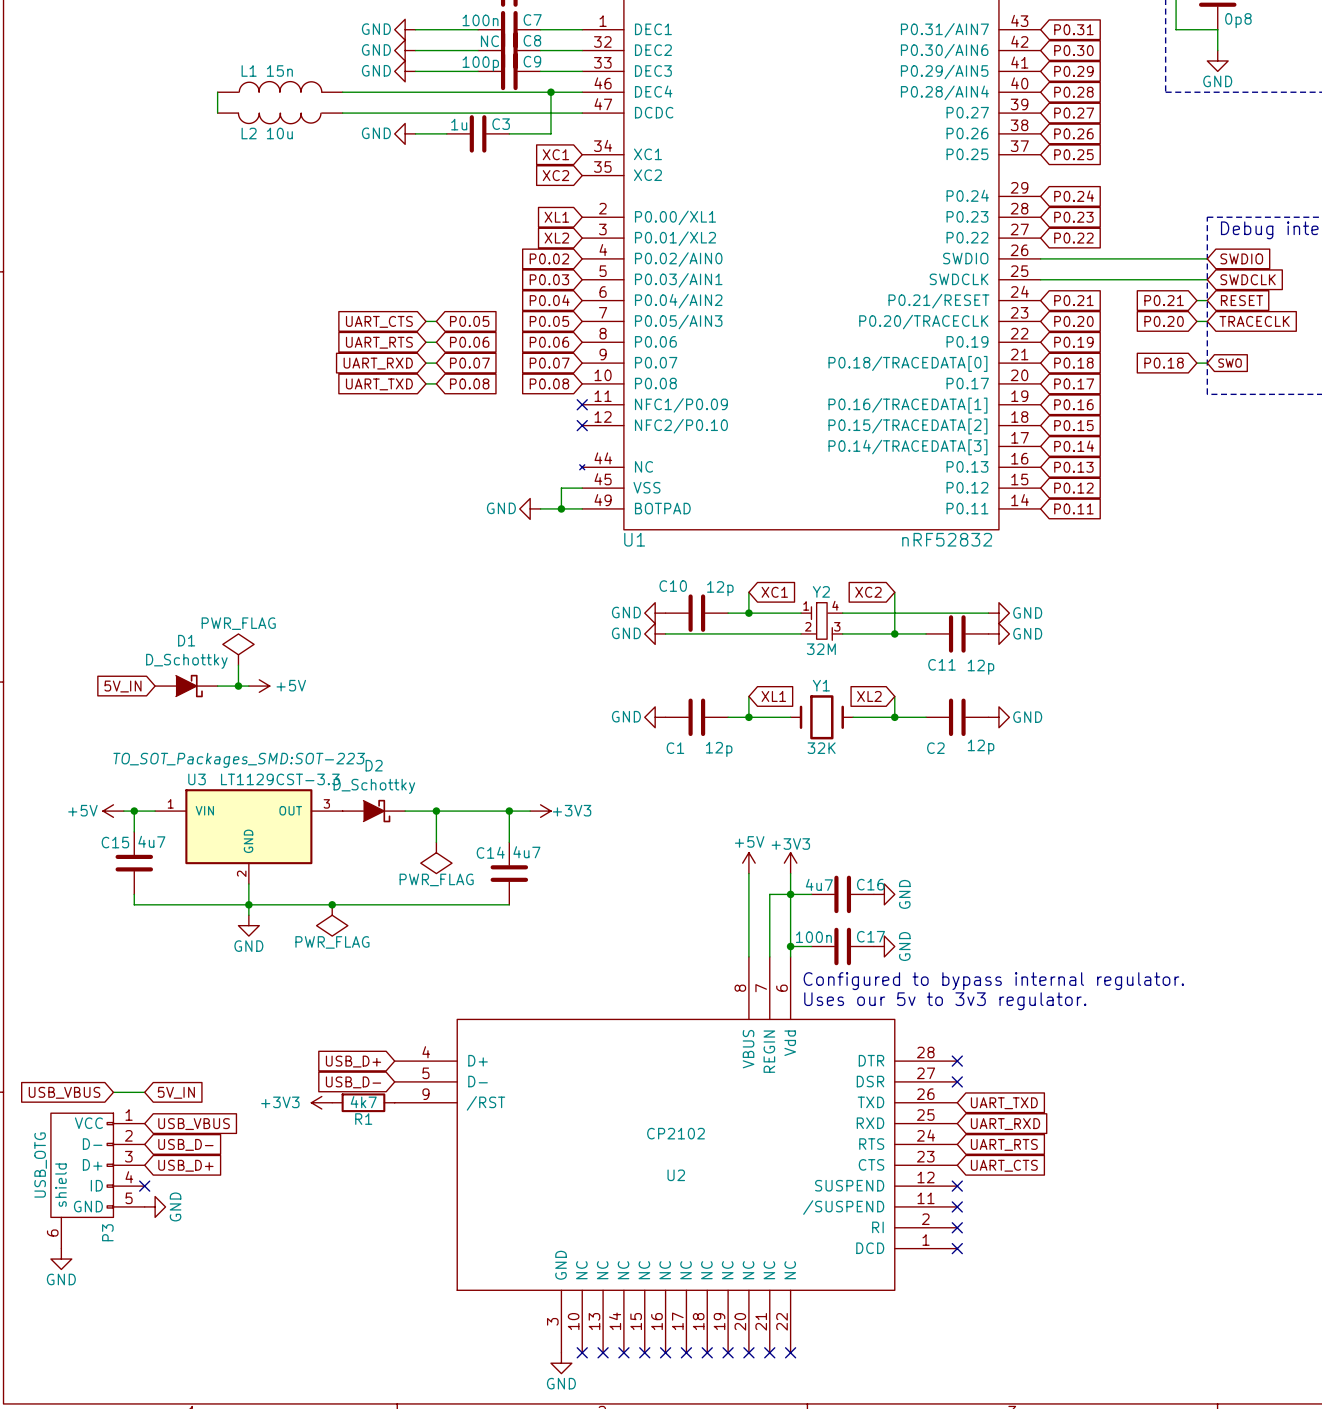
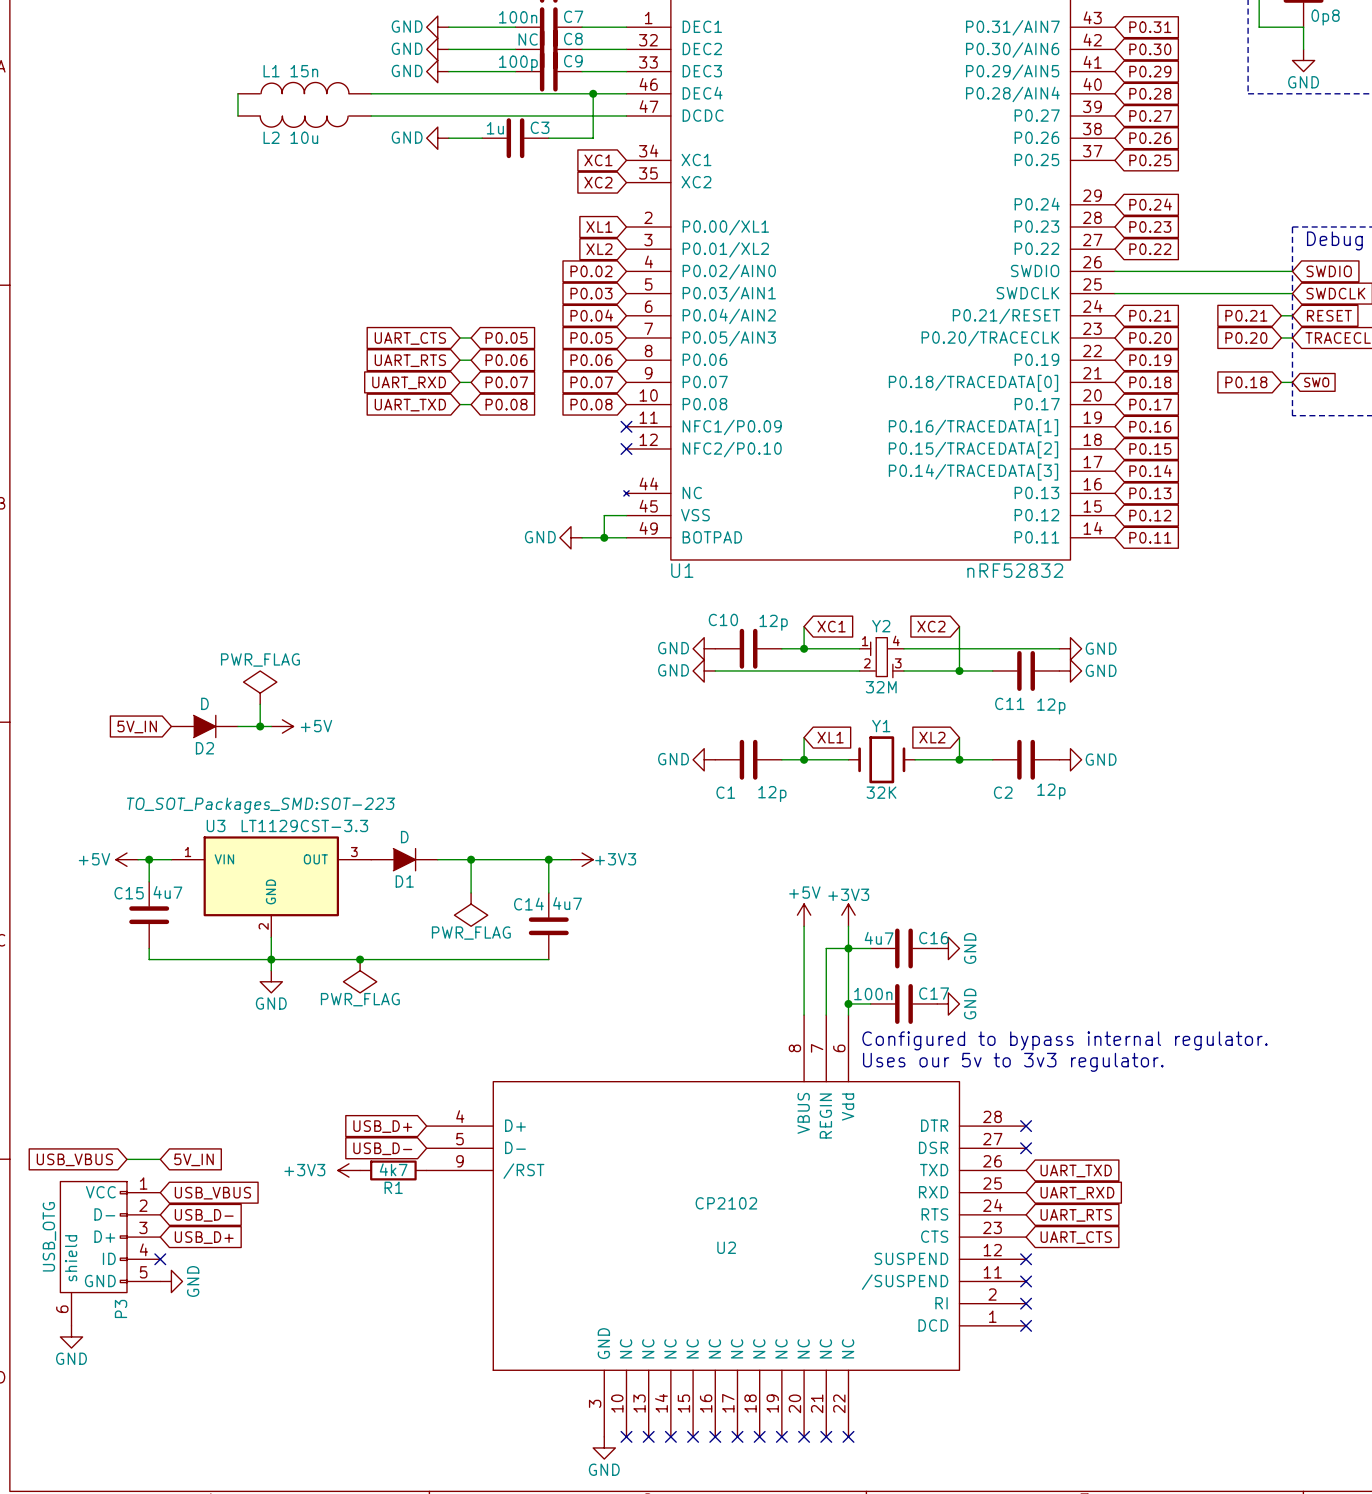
D1 name position: D1 (186, 640) -> D1 (404, 881)
D1 value: D_Schottky (186, 661) -> D (404, 837)
D1 symbol: [155, 674, 218, 698] -> [371, 847, 438, 872]
D2 name position: D2 (374, 765) -> D2 (204, 748)
D2 value: D_Schottky (374, 786) -> D (204, 703)
D2 symbol: [342, 799, 406, 823] -> [171, 714, 238, 739]

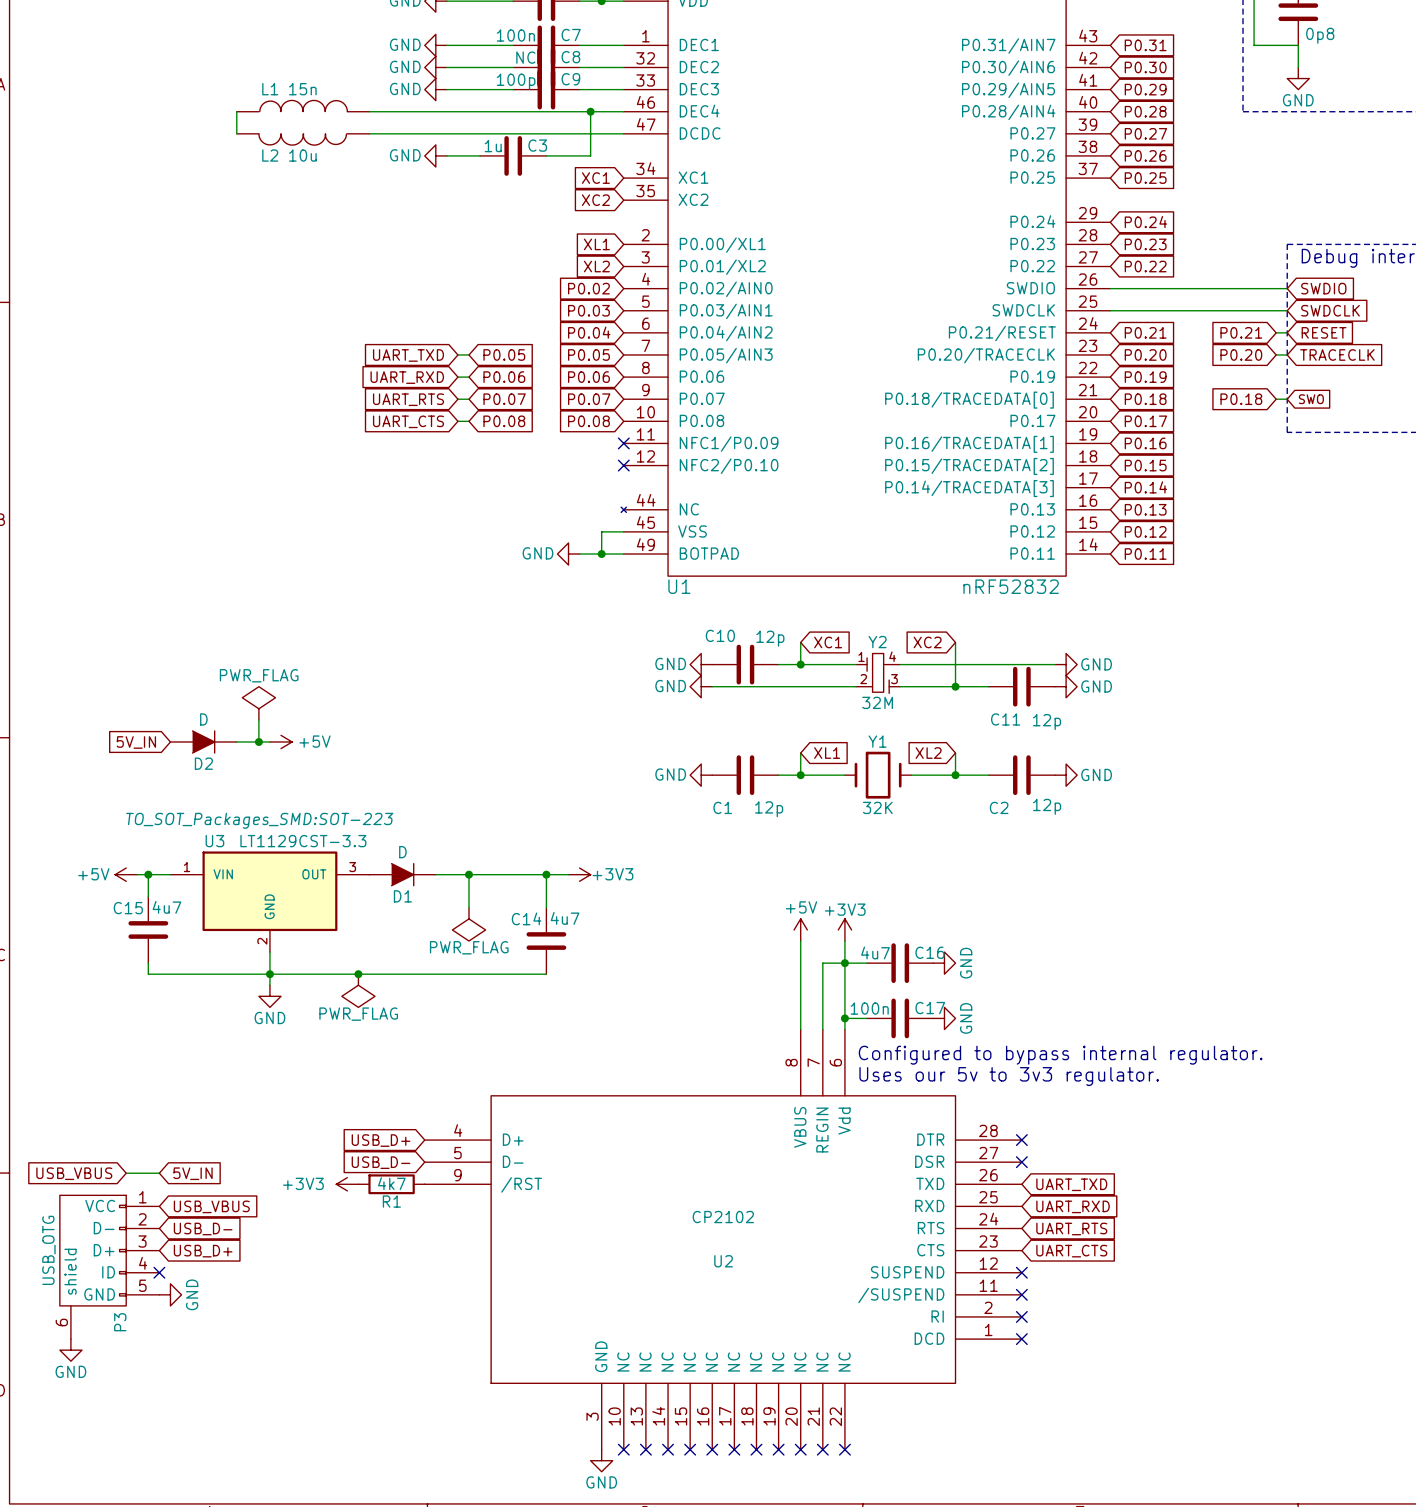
global label: UART_CTS (410, 338) -> UART_TXD (408, 355)
global label: UART_RTS (410, 360) -> UART_RXD (407, 377)
global label: UART_RXD (409, 382) -> UART_RTS (408, 399)
global label: UART_TXD (410, 405) -> UART_CTS (408, 421)

